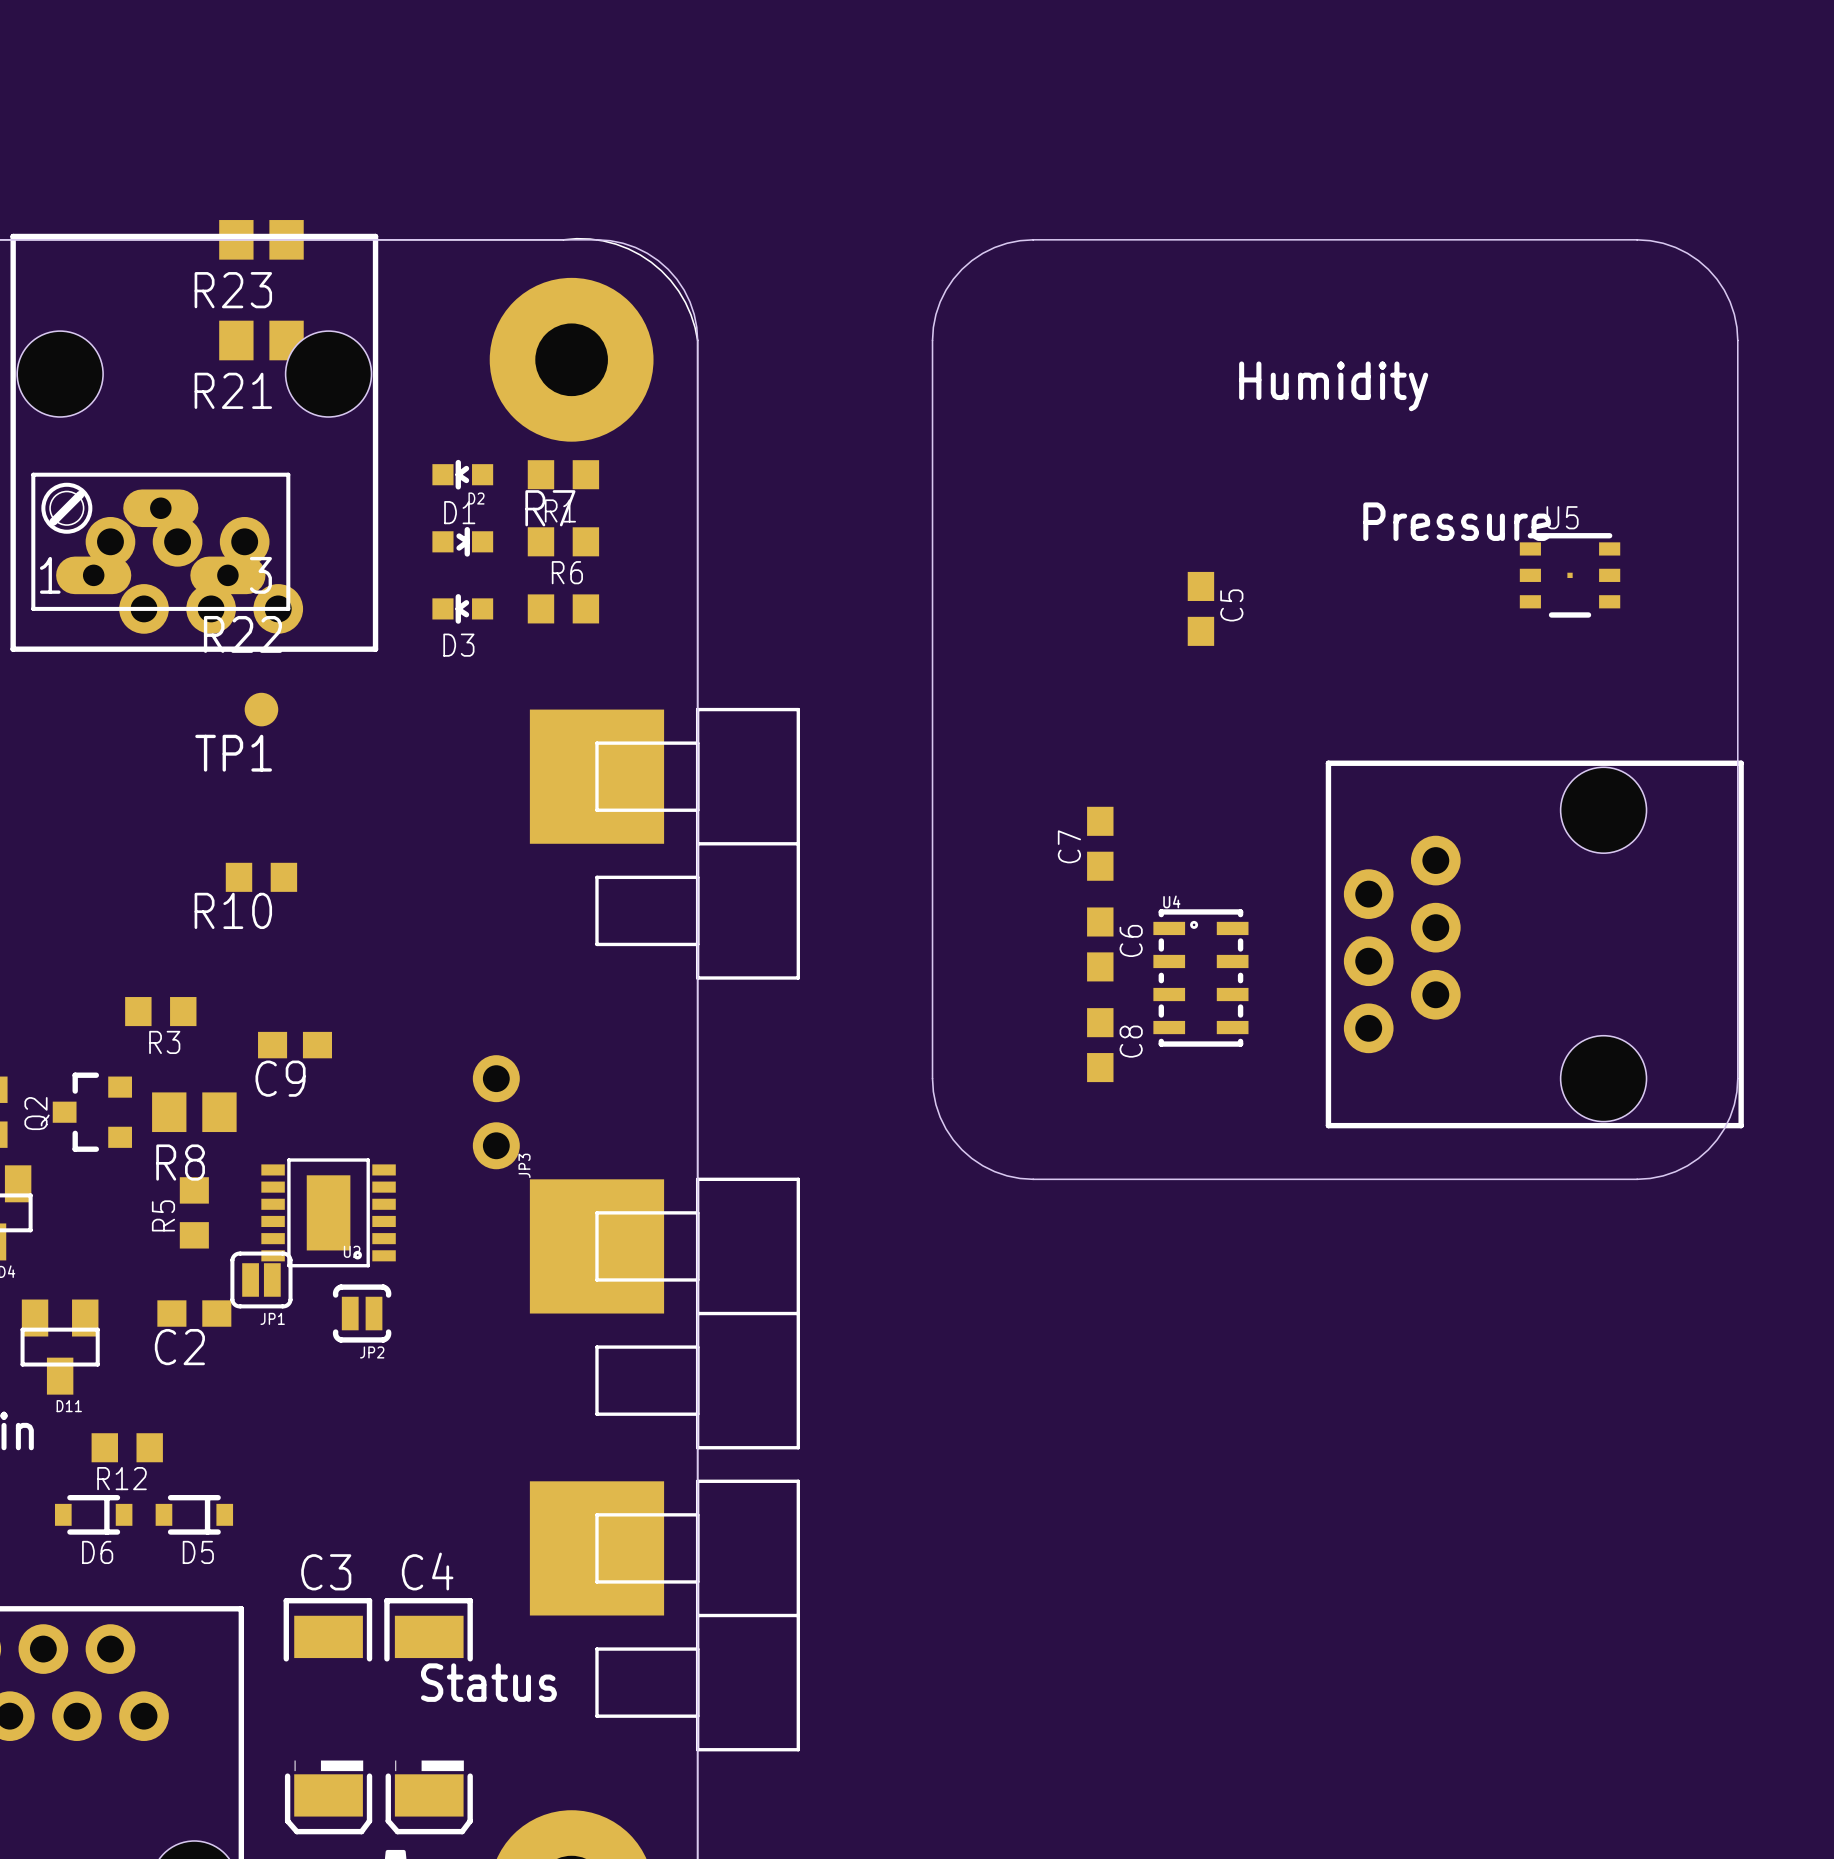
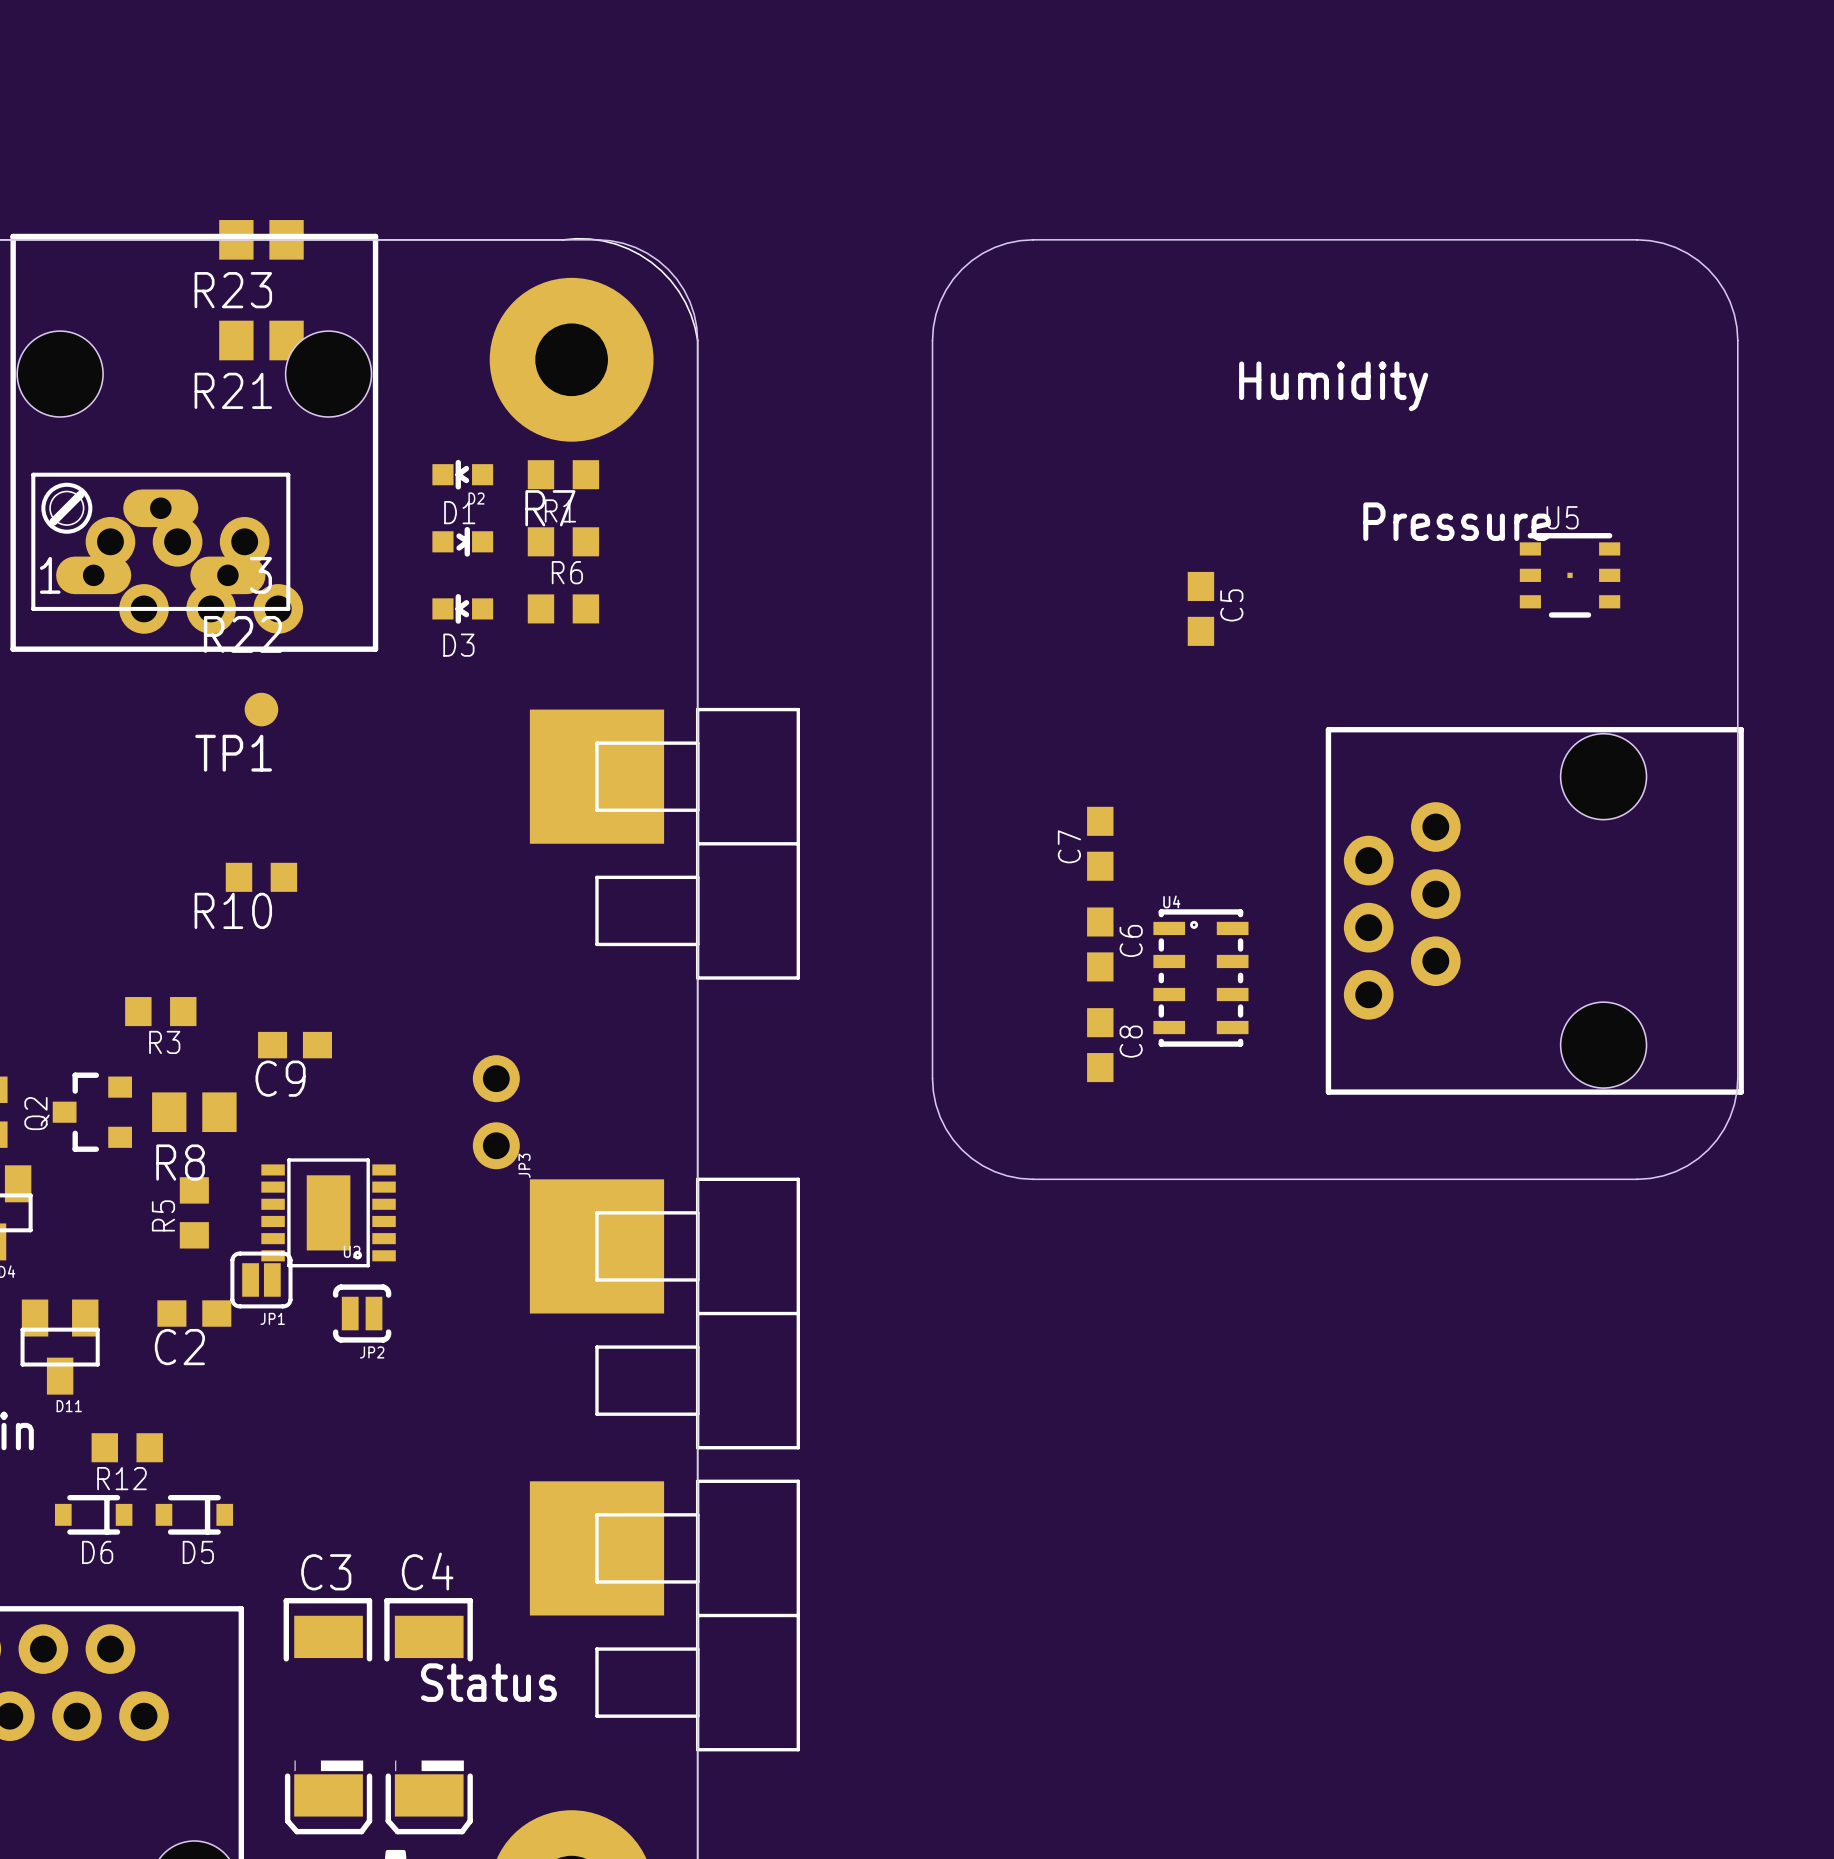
part position: (1534, 944) -> (1534, 910)

